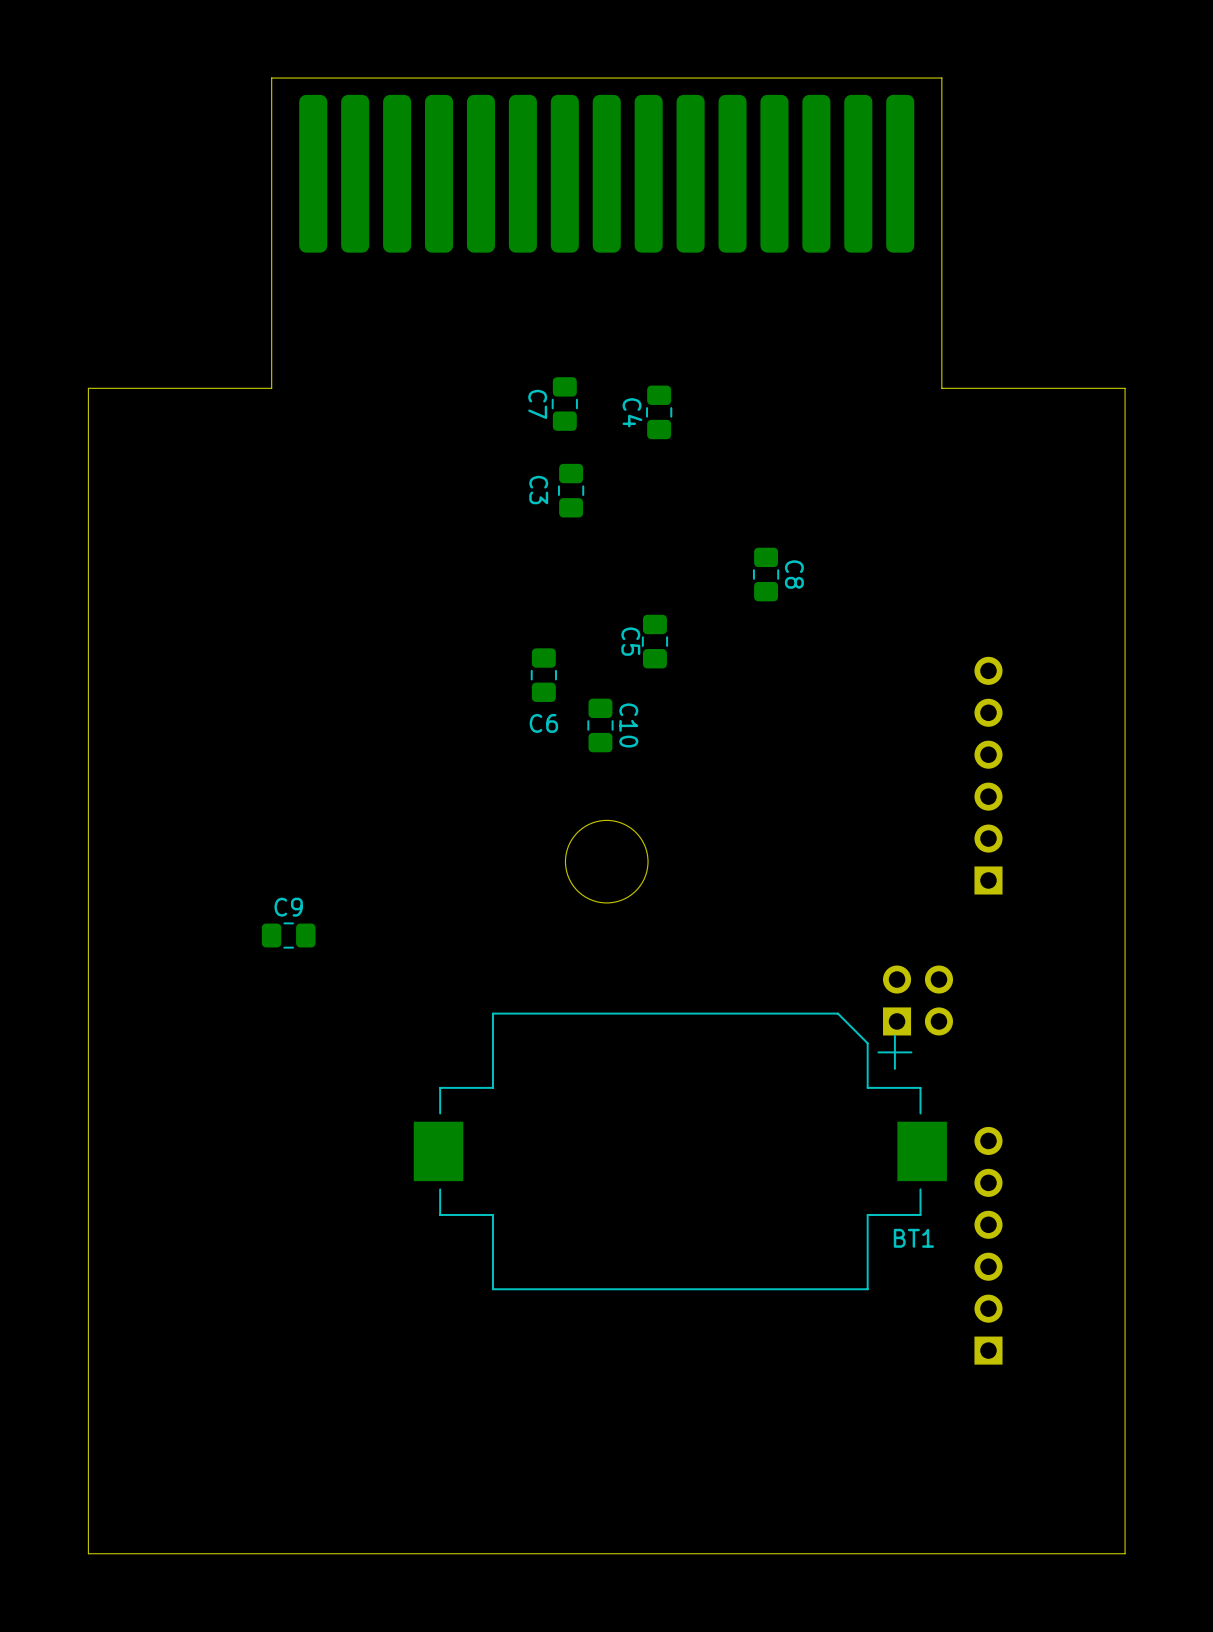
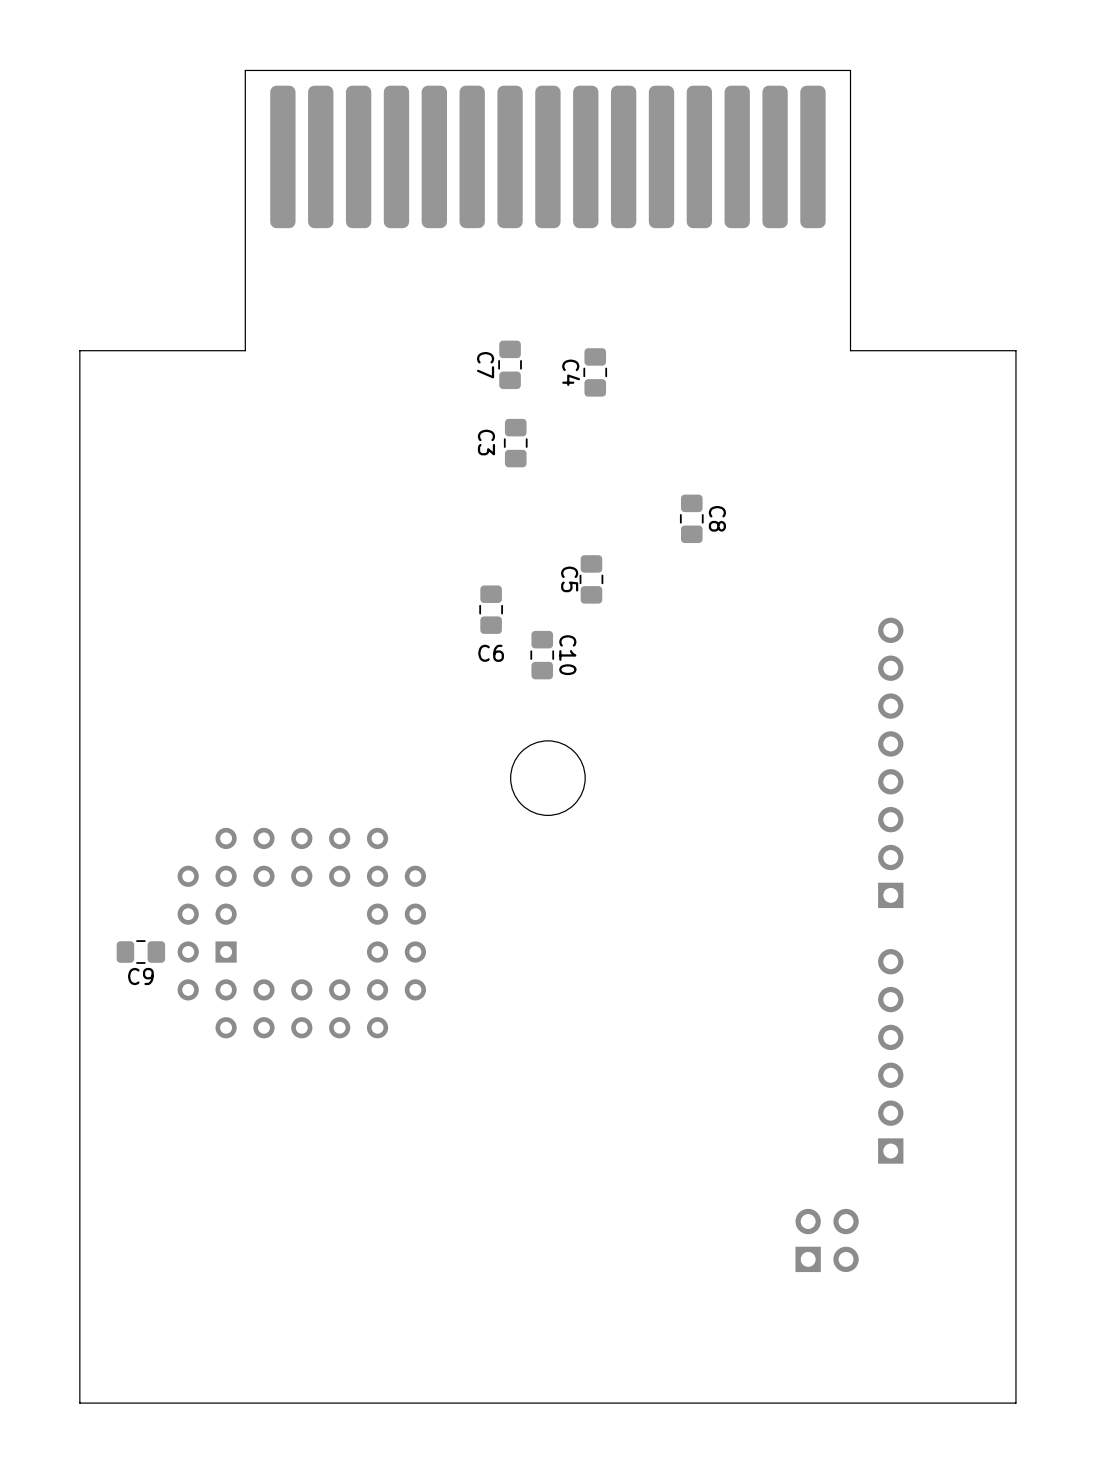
part: (988, 775) -> none
part: none -> (890, 762)
C9 name position: C9 (288, 907) -> C9 (140, 976)
C9 position: (288, 935) -> (140, 952)
part position: (918, 1000) -> (827, 1240)
part: none -> (301, 933)
BT1: (680, 1151) -> none
part position: (988, 1245) -> (890, 1056)

